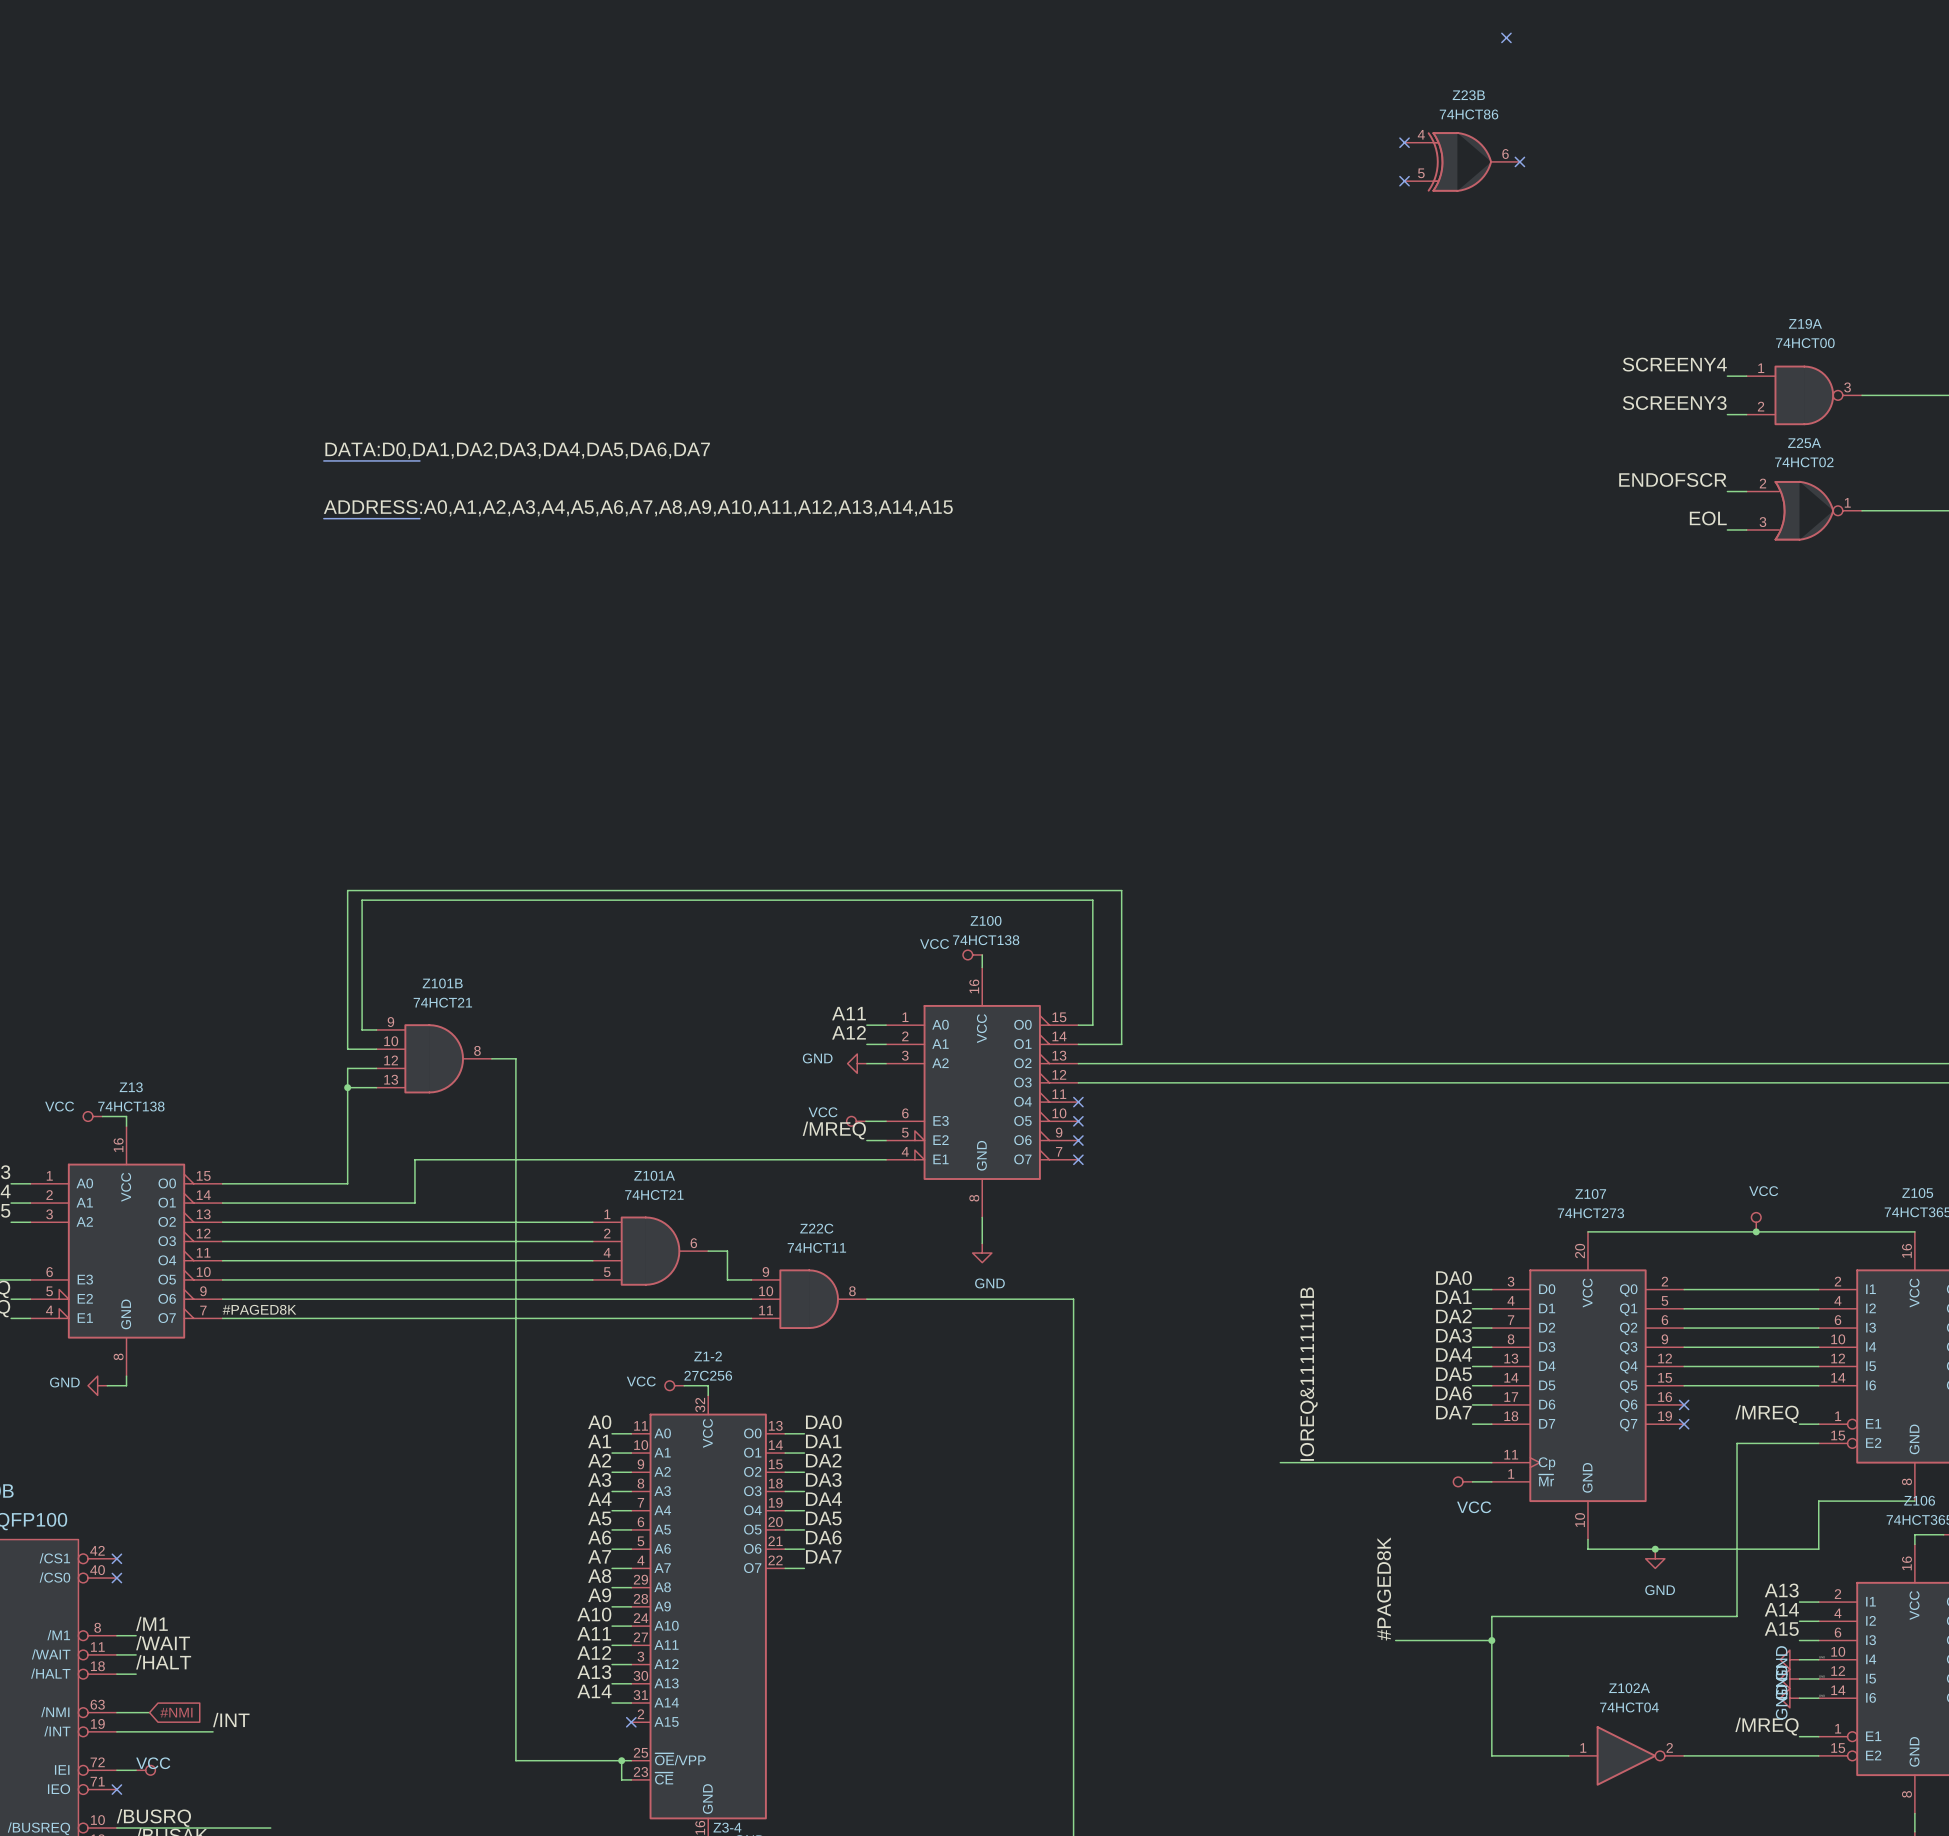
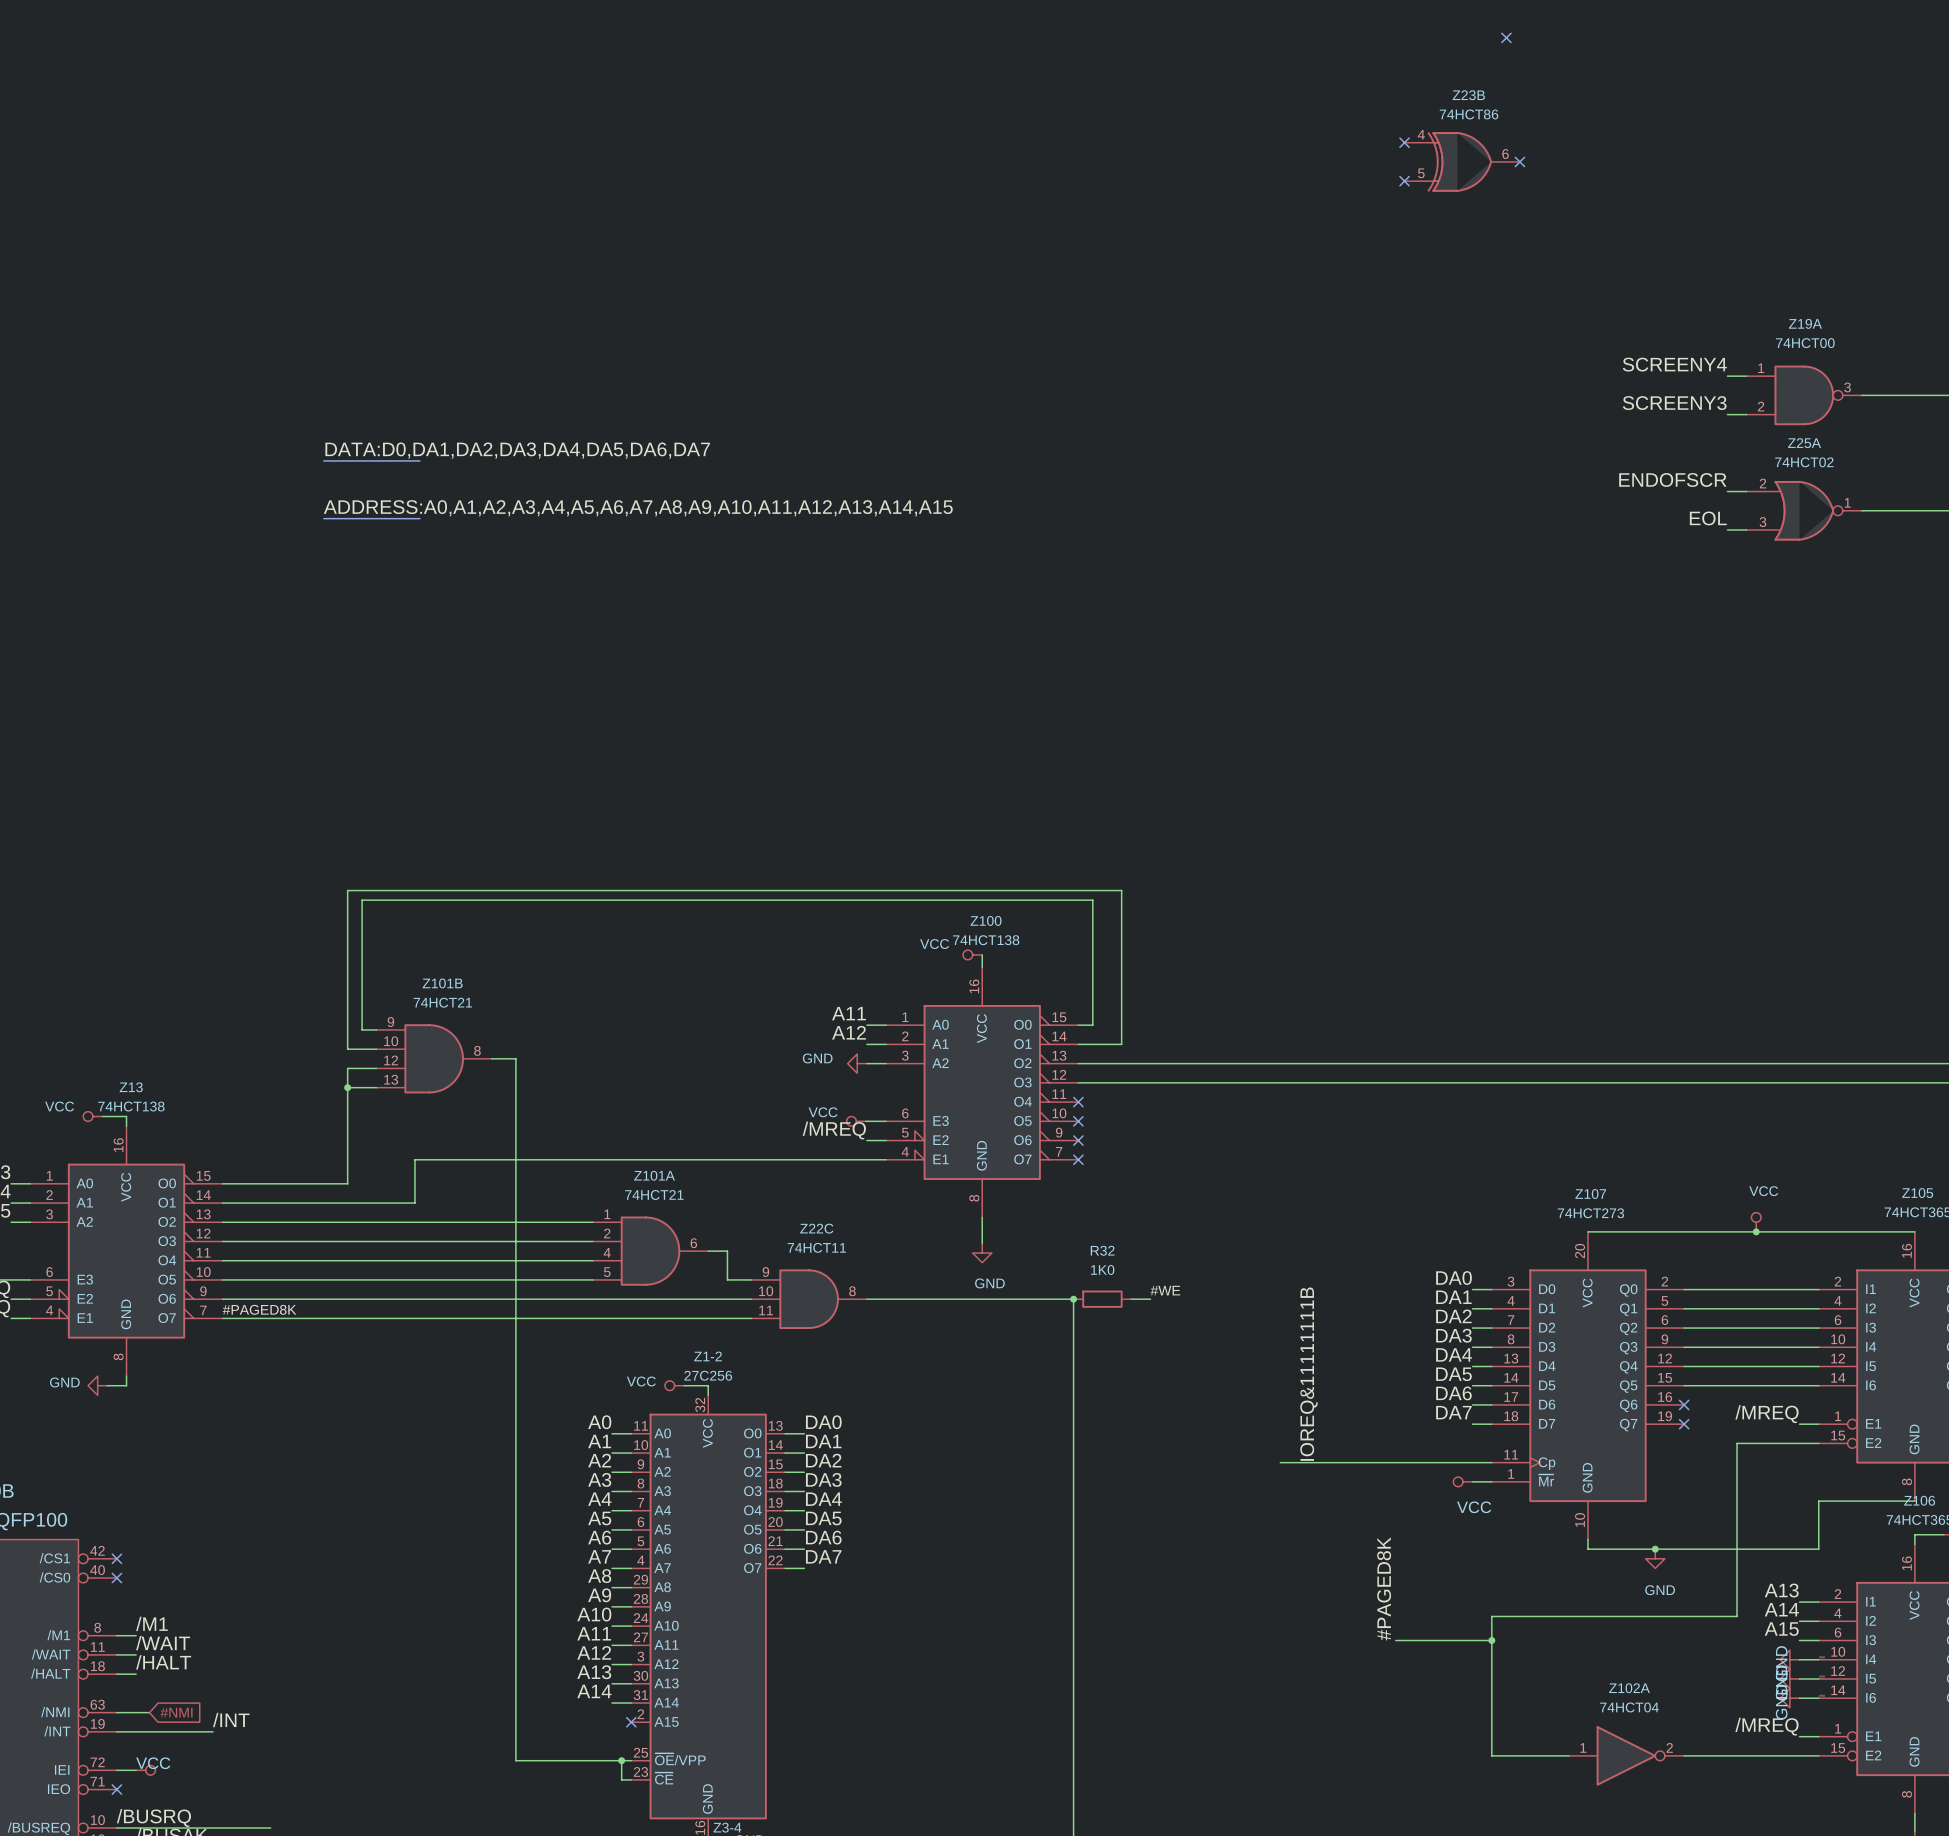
label: none -> #WE (1165, 1290)
junction: none -> (1073, 1299)
R32: none -> 1K0 (1102, 1299)
wire: none -> (1131, 1299) (1150, 1299)

